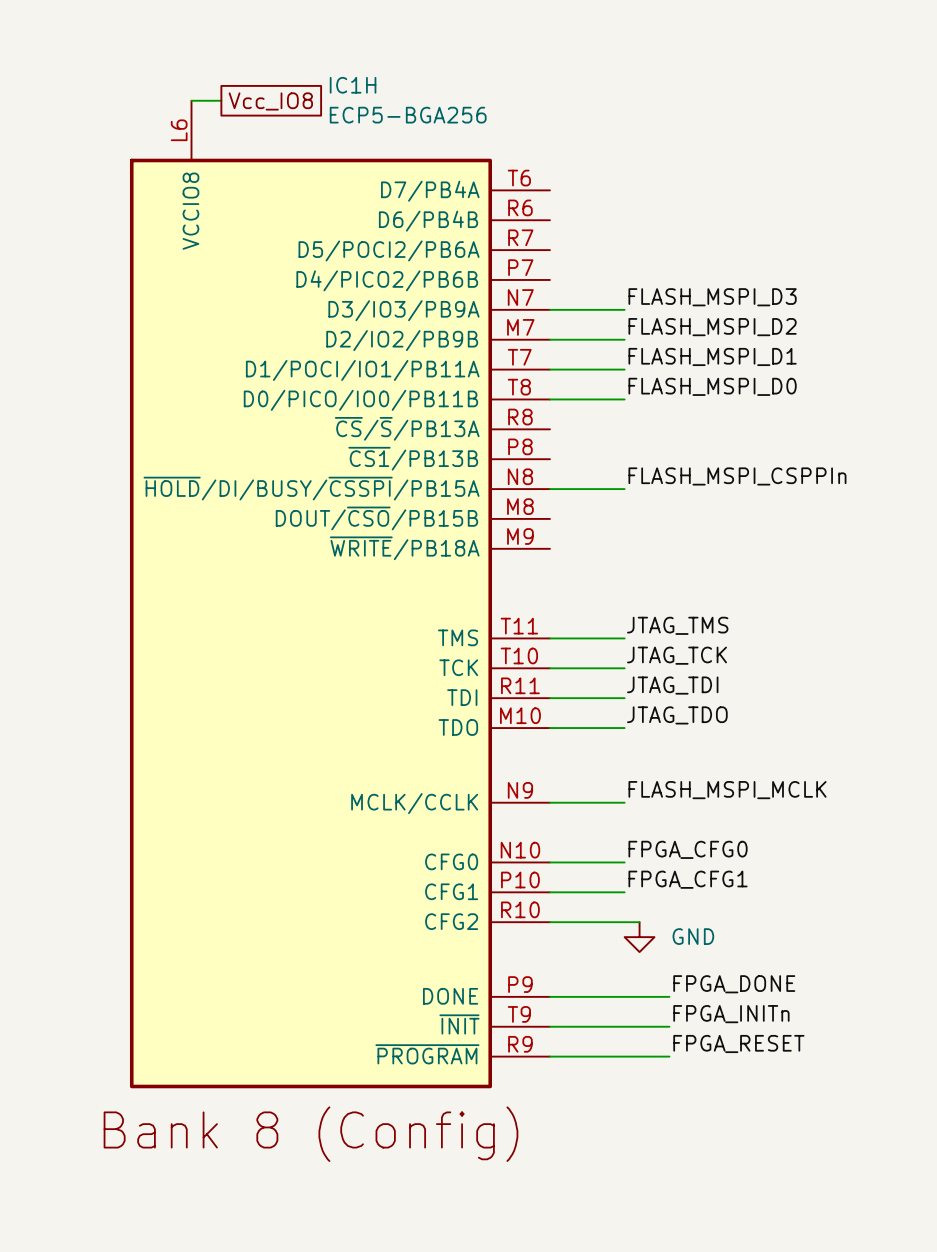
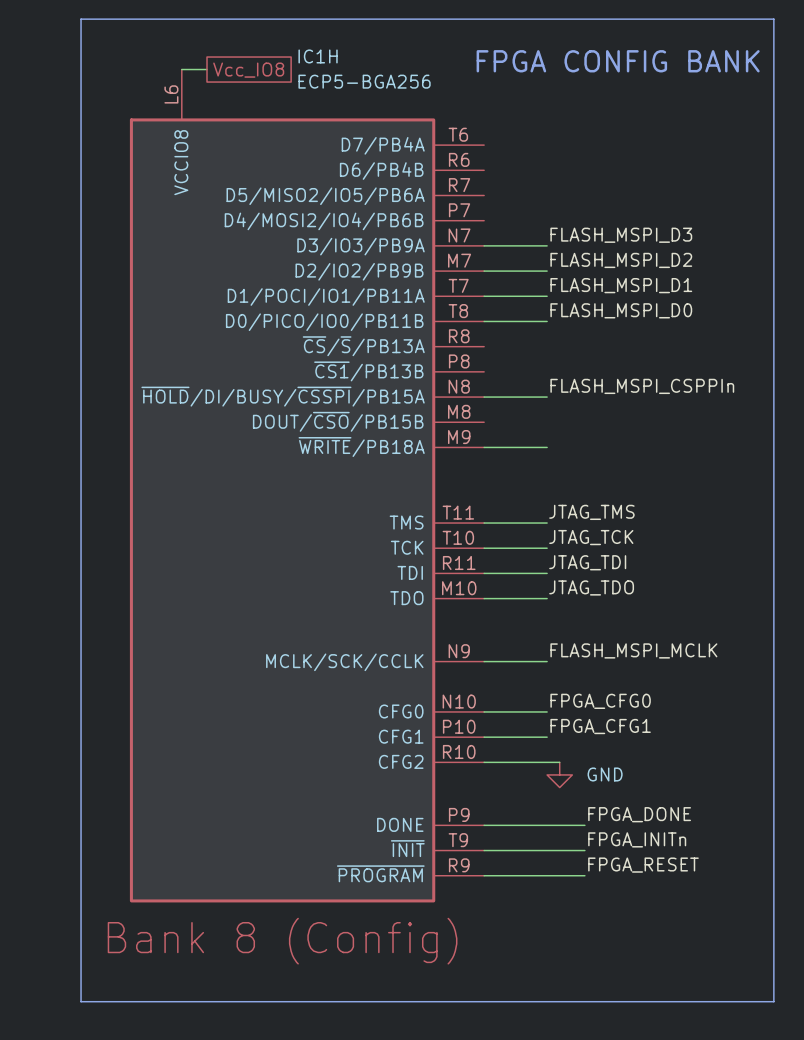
line: none -> (81, 19) (773, 19) (773, 1001) (81, 1001) (81, 19)
text: none -> FPGA CONFIG BANK (618, 61)
IC1H pin name: D5/POCI2/PB6A (389, 250) -> D5/MISO2/IO5/PB6A (325, 196)
IC1H pin name: D4/PICO2/PB6B (387, 280) -> D4/MOSI2/IO4/PB6B (324, 221)
wire: none -> (484, 447) (547, 447)
IC1H pin name: MCLK/CCLK (414, 803) -> MCLK/SCK/CCLK (344, 662)

